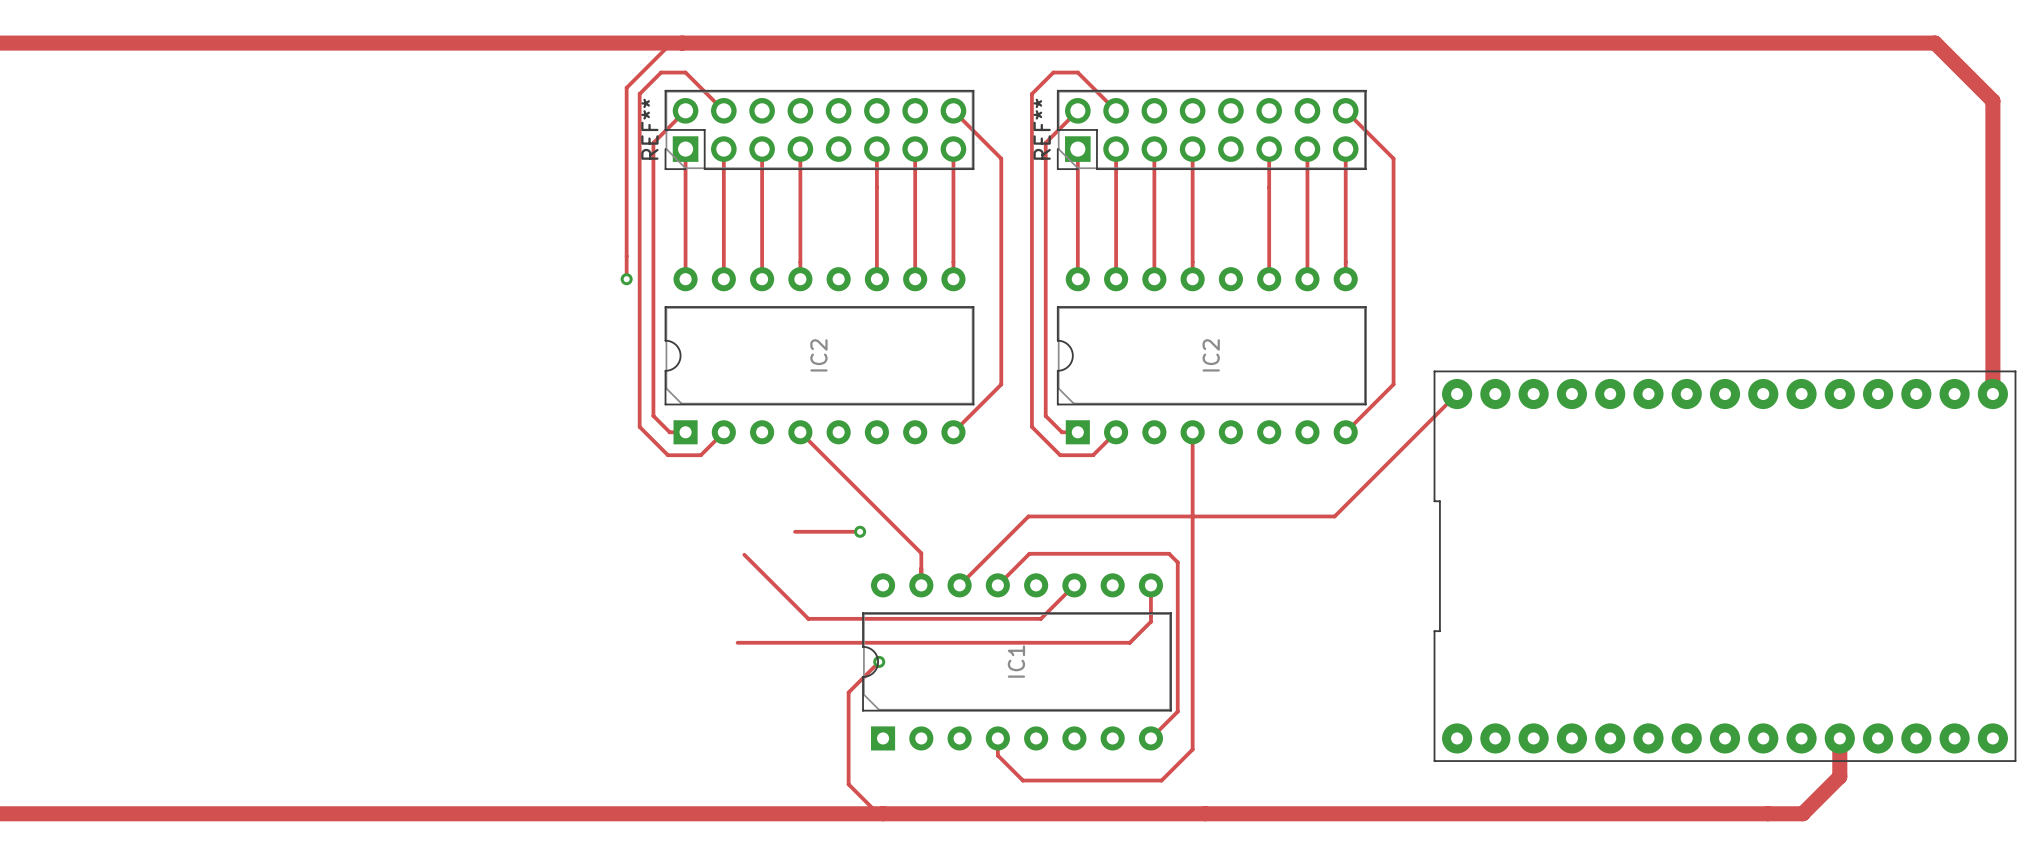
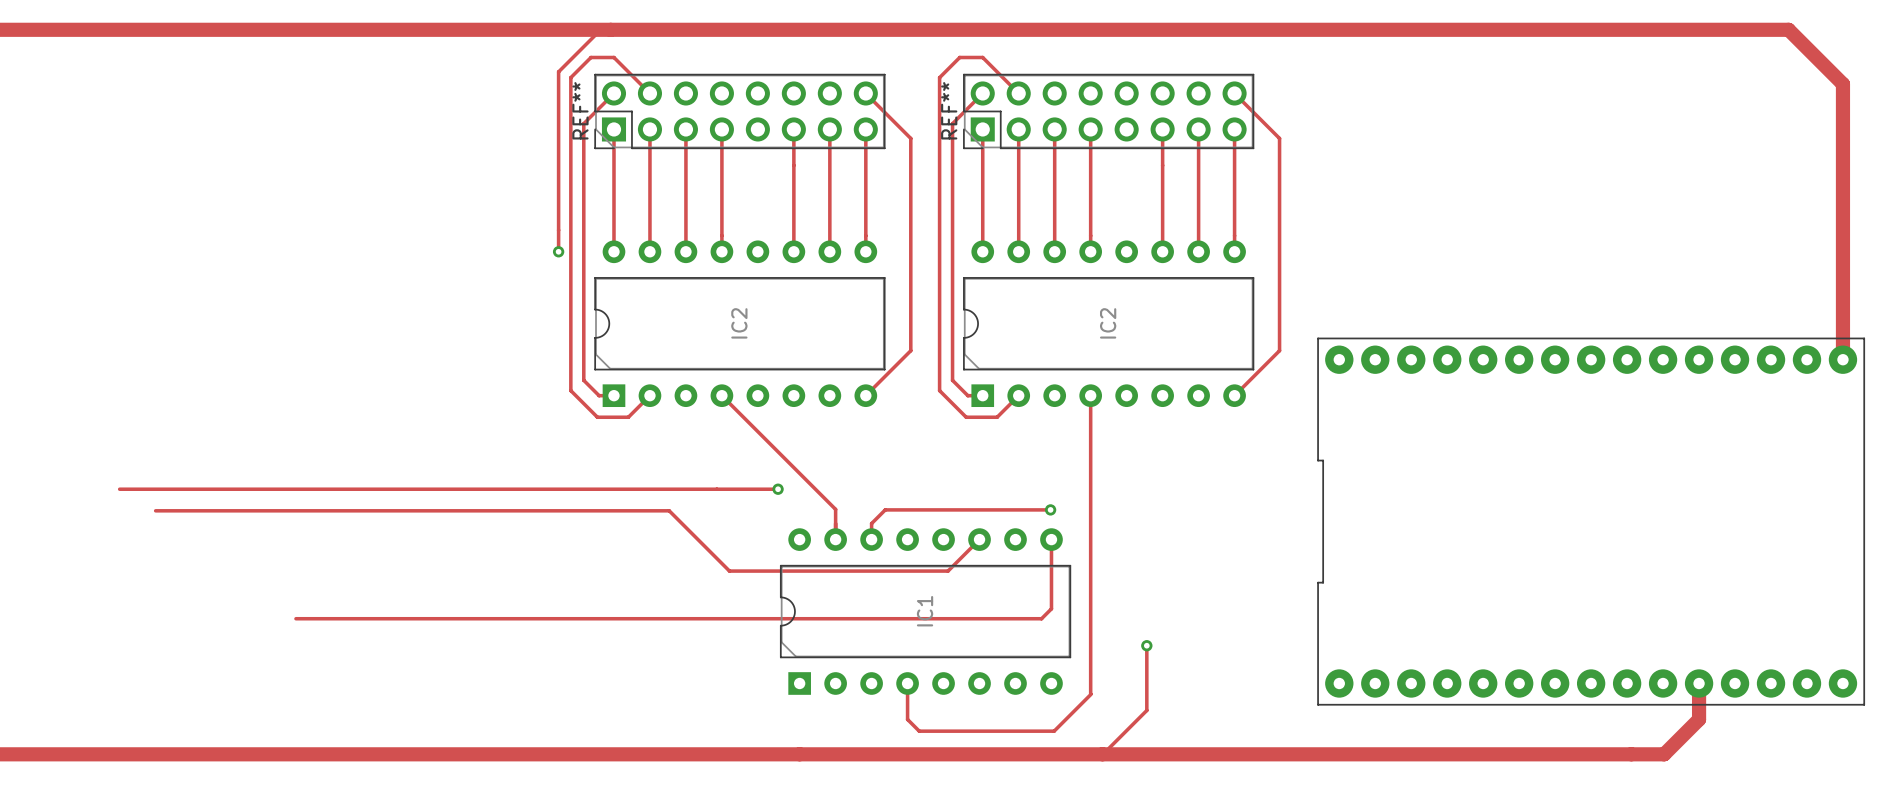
track: (1457, 394) (1334, 516) (1028, 516) (959, 585) -> none
track: none -> (119, 489) (716, 489)
track: (1029, 553) (997, 585) -> (937, 509) (885, 509) (871, 523) (871, 539)
track: (1149, 553) (1169, 553) (1177, 562) (1177, 711) (1150, 738) -> none
via: none -> (1050, 509)
track: none -> (155, 510) (669, 510)
track: (1150, 621) (1129, 642) (737, 642) -> (1051, 573) (1051, 608) (1041, 618) (295, 618)
track: (879, 661) (848, 692) (848, 784) (878, 813) (883, 813) -> none
via: (879, 661) -> none
track: none -> (1146, 645) (1146, 710) (1102, 754)
via: none -> (1146, 645)
track: (1192, 749) (1161, 780) (1022, 780) (997, 755) -> (1091, 694) (1054, 731) (919, 731) (907, 719) (907, 699)

